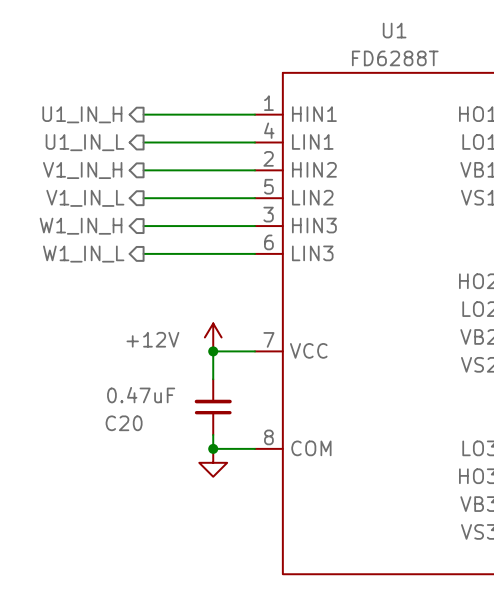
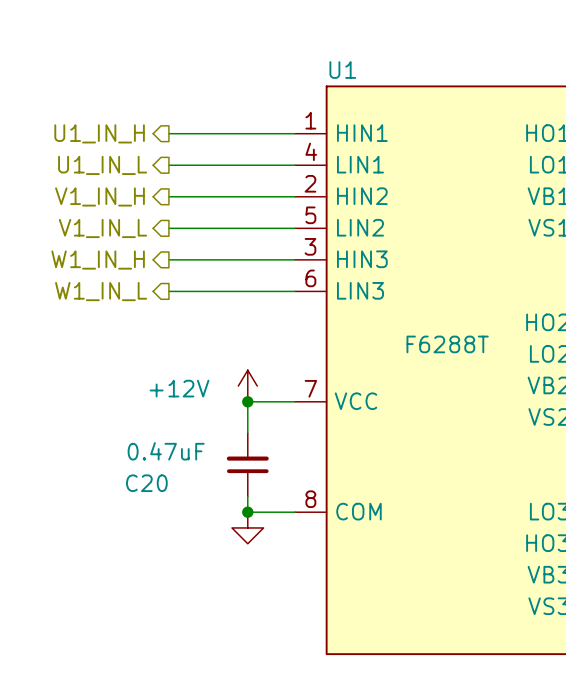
U1 name position: U1 (394, 30) -> U1 (342, 70)
U1 value: FD6288T (395, 58) -> F6288T (447, 344)

